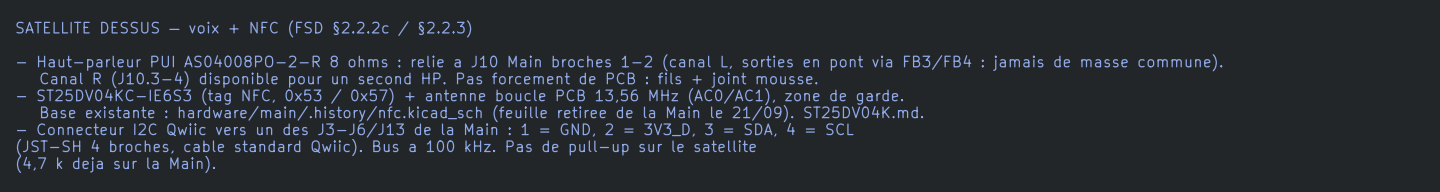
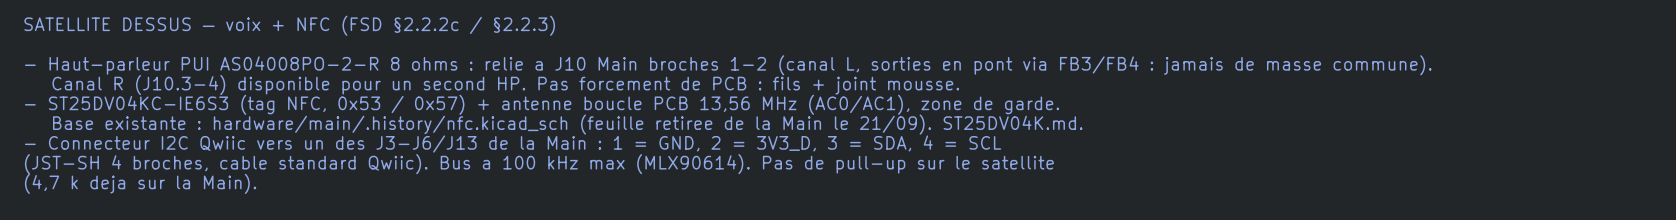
text: (JST-SH 4 broches, cable standard Qwiic). Bus a 100 kHz. Pas de pull-up sur le satellite (386, 147) -> (JST-SH 4 broches, cable standard Qwiic). Bus a 100 kHz max (MLX90614). Pas de pull-up sur le satellite (539, 164)

